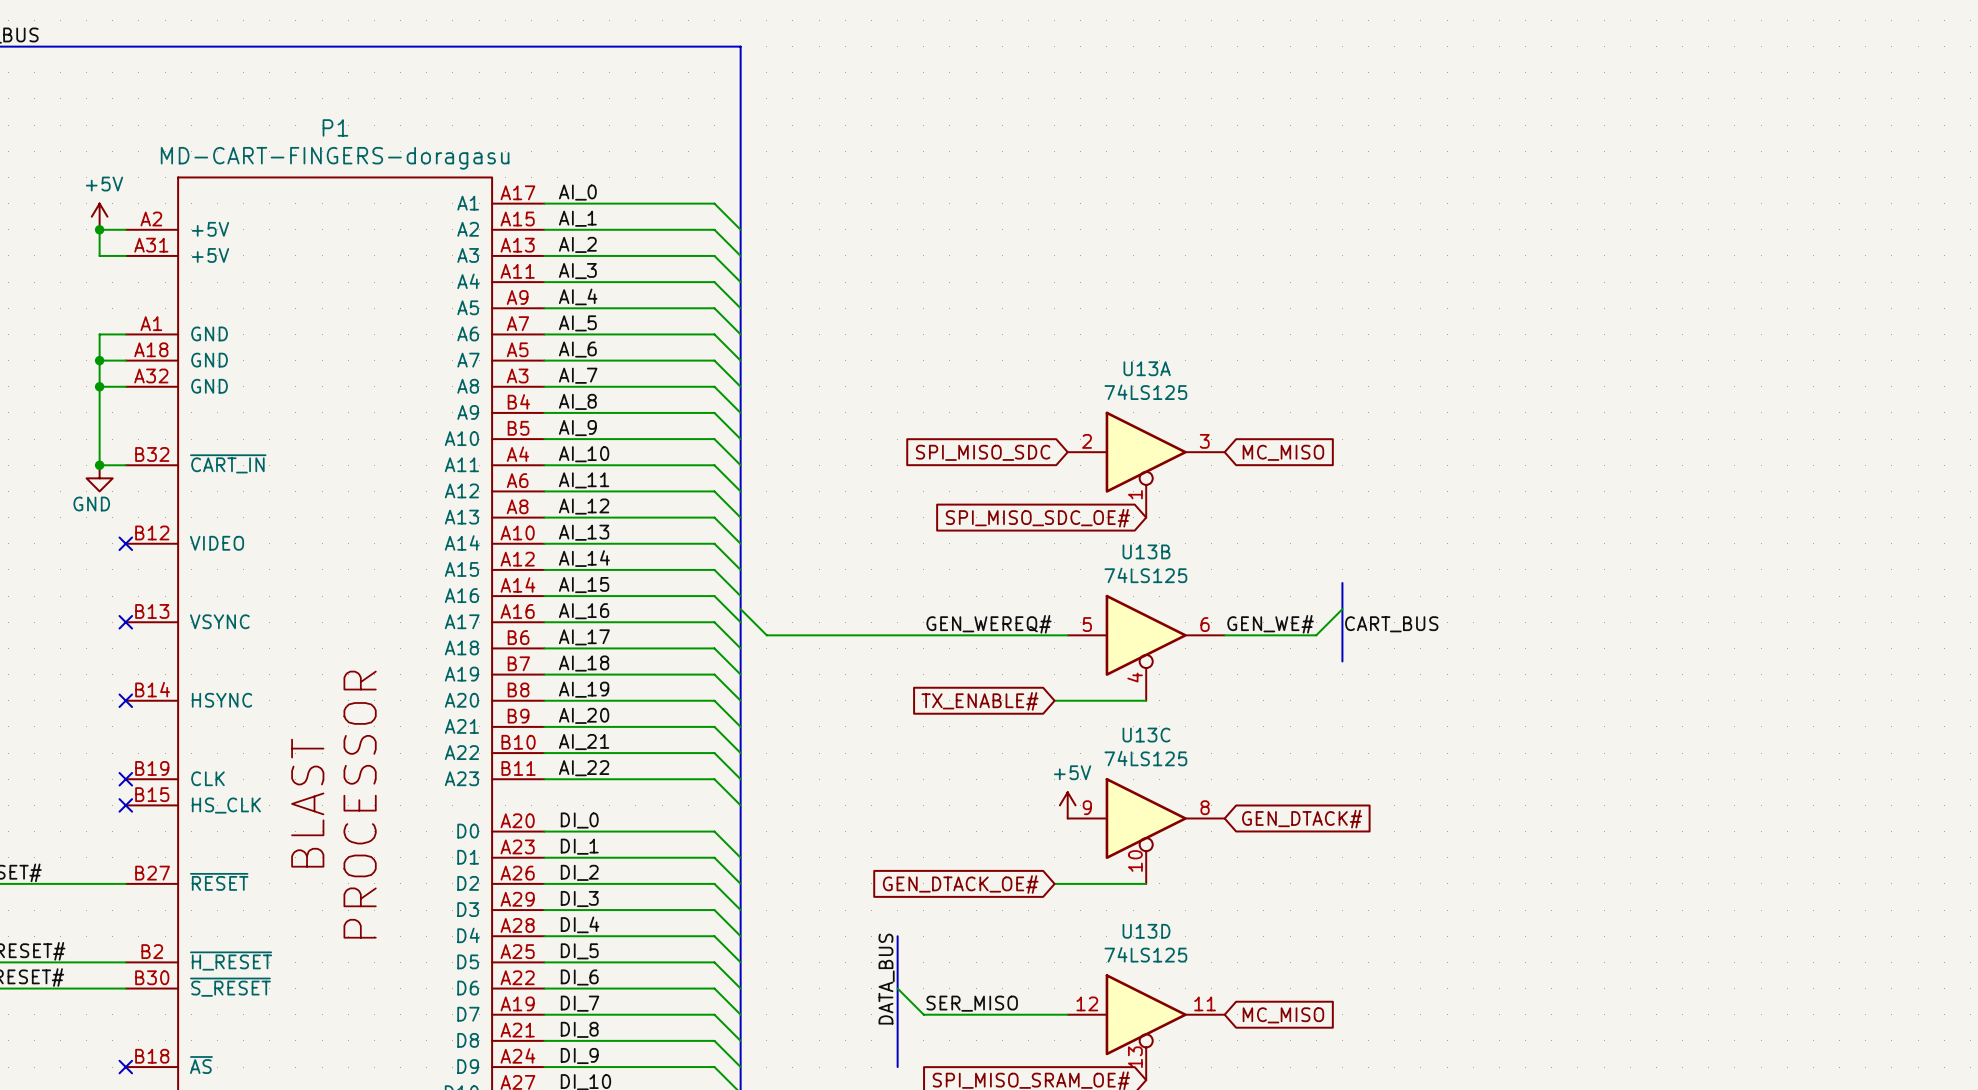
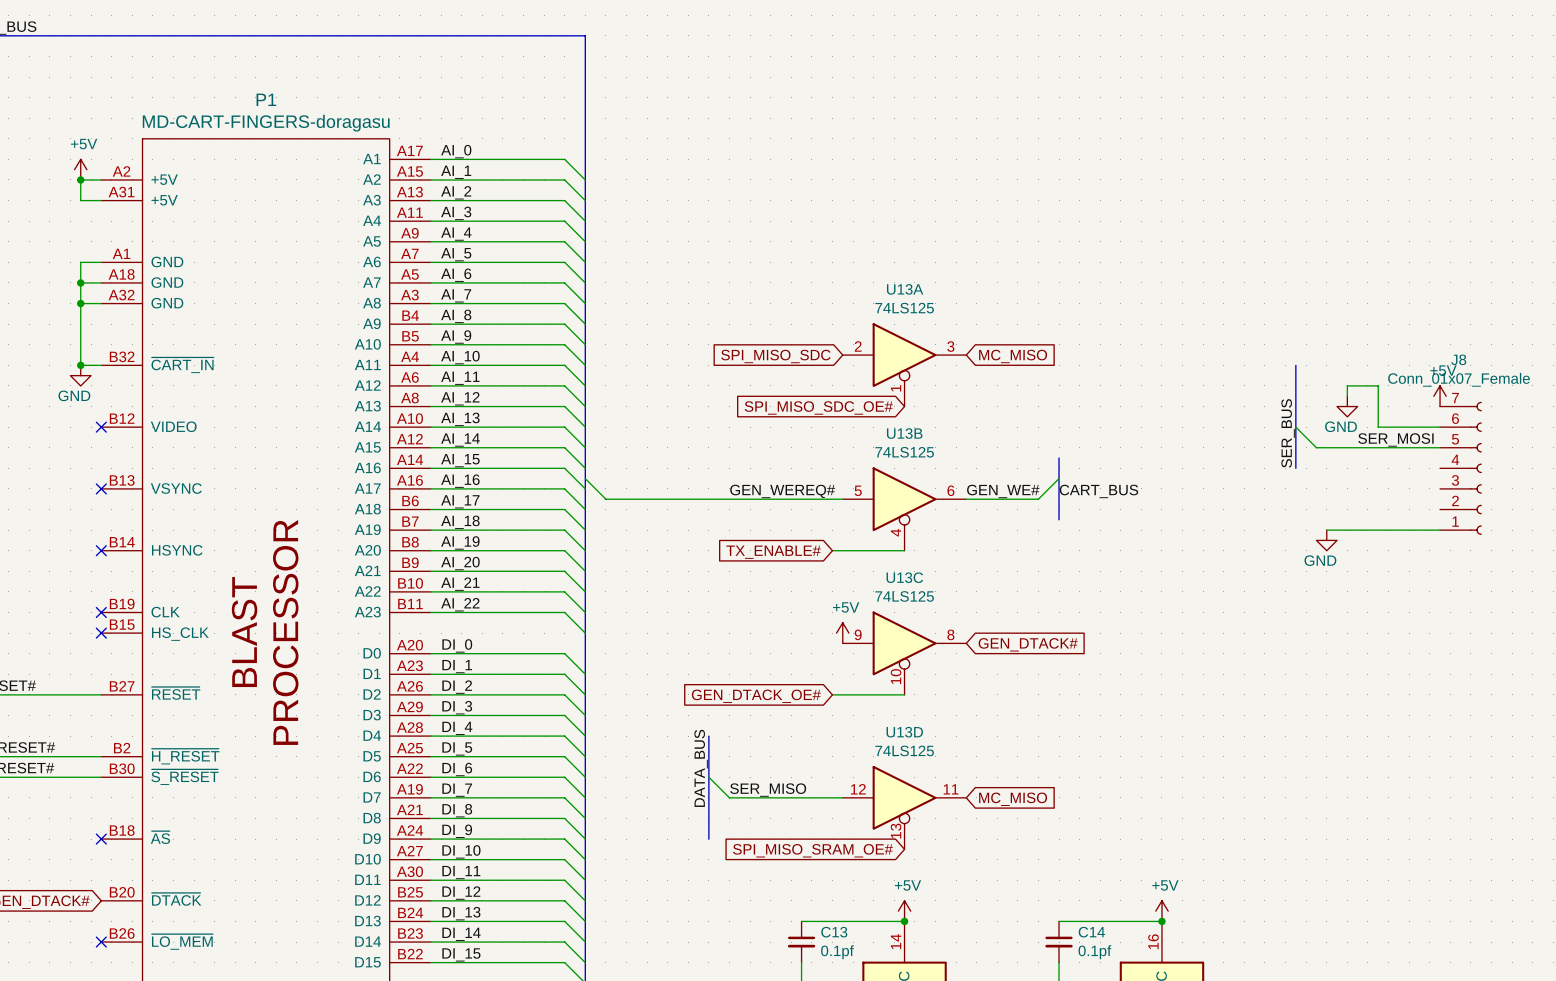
bus: none -> (1295, 365) (1295, 468)
wire: none -> (1347, 396) (1347, 385) (1378, 385) (1378, 427) (1440, 427)
power symbol: none -> +5V (1440, 396)
power symbol: none -> GND (1347, 406)
wire: none -> (1295, 427) (1316, 447) (1440, 447)
label: none -> SER_BUS (1288, 433)
label: none -> SER_MOSI (1395, 439)
J8: none -> Conn_01x07_Female (1460, 468)
wire: none -> (1326, 530) (1440, 530)
power symbol: none -> GND (1326, 540)

